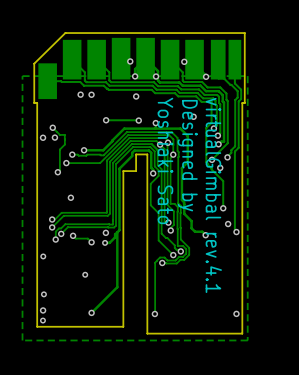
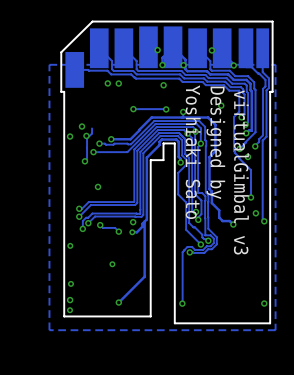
track: (52, 127) (59, 134) (64, 134) (64, 139) -> none
via: (52, 127) -> none
via: (43, 137) -> none
via: none -> (86, 135)
via: none -> (70, 136)
text: virtualGimbal rev.4.1 (213, 195) -> virtualGimbal v3 (241, 172)

